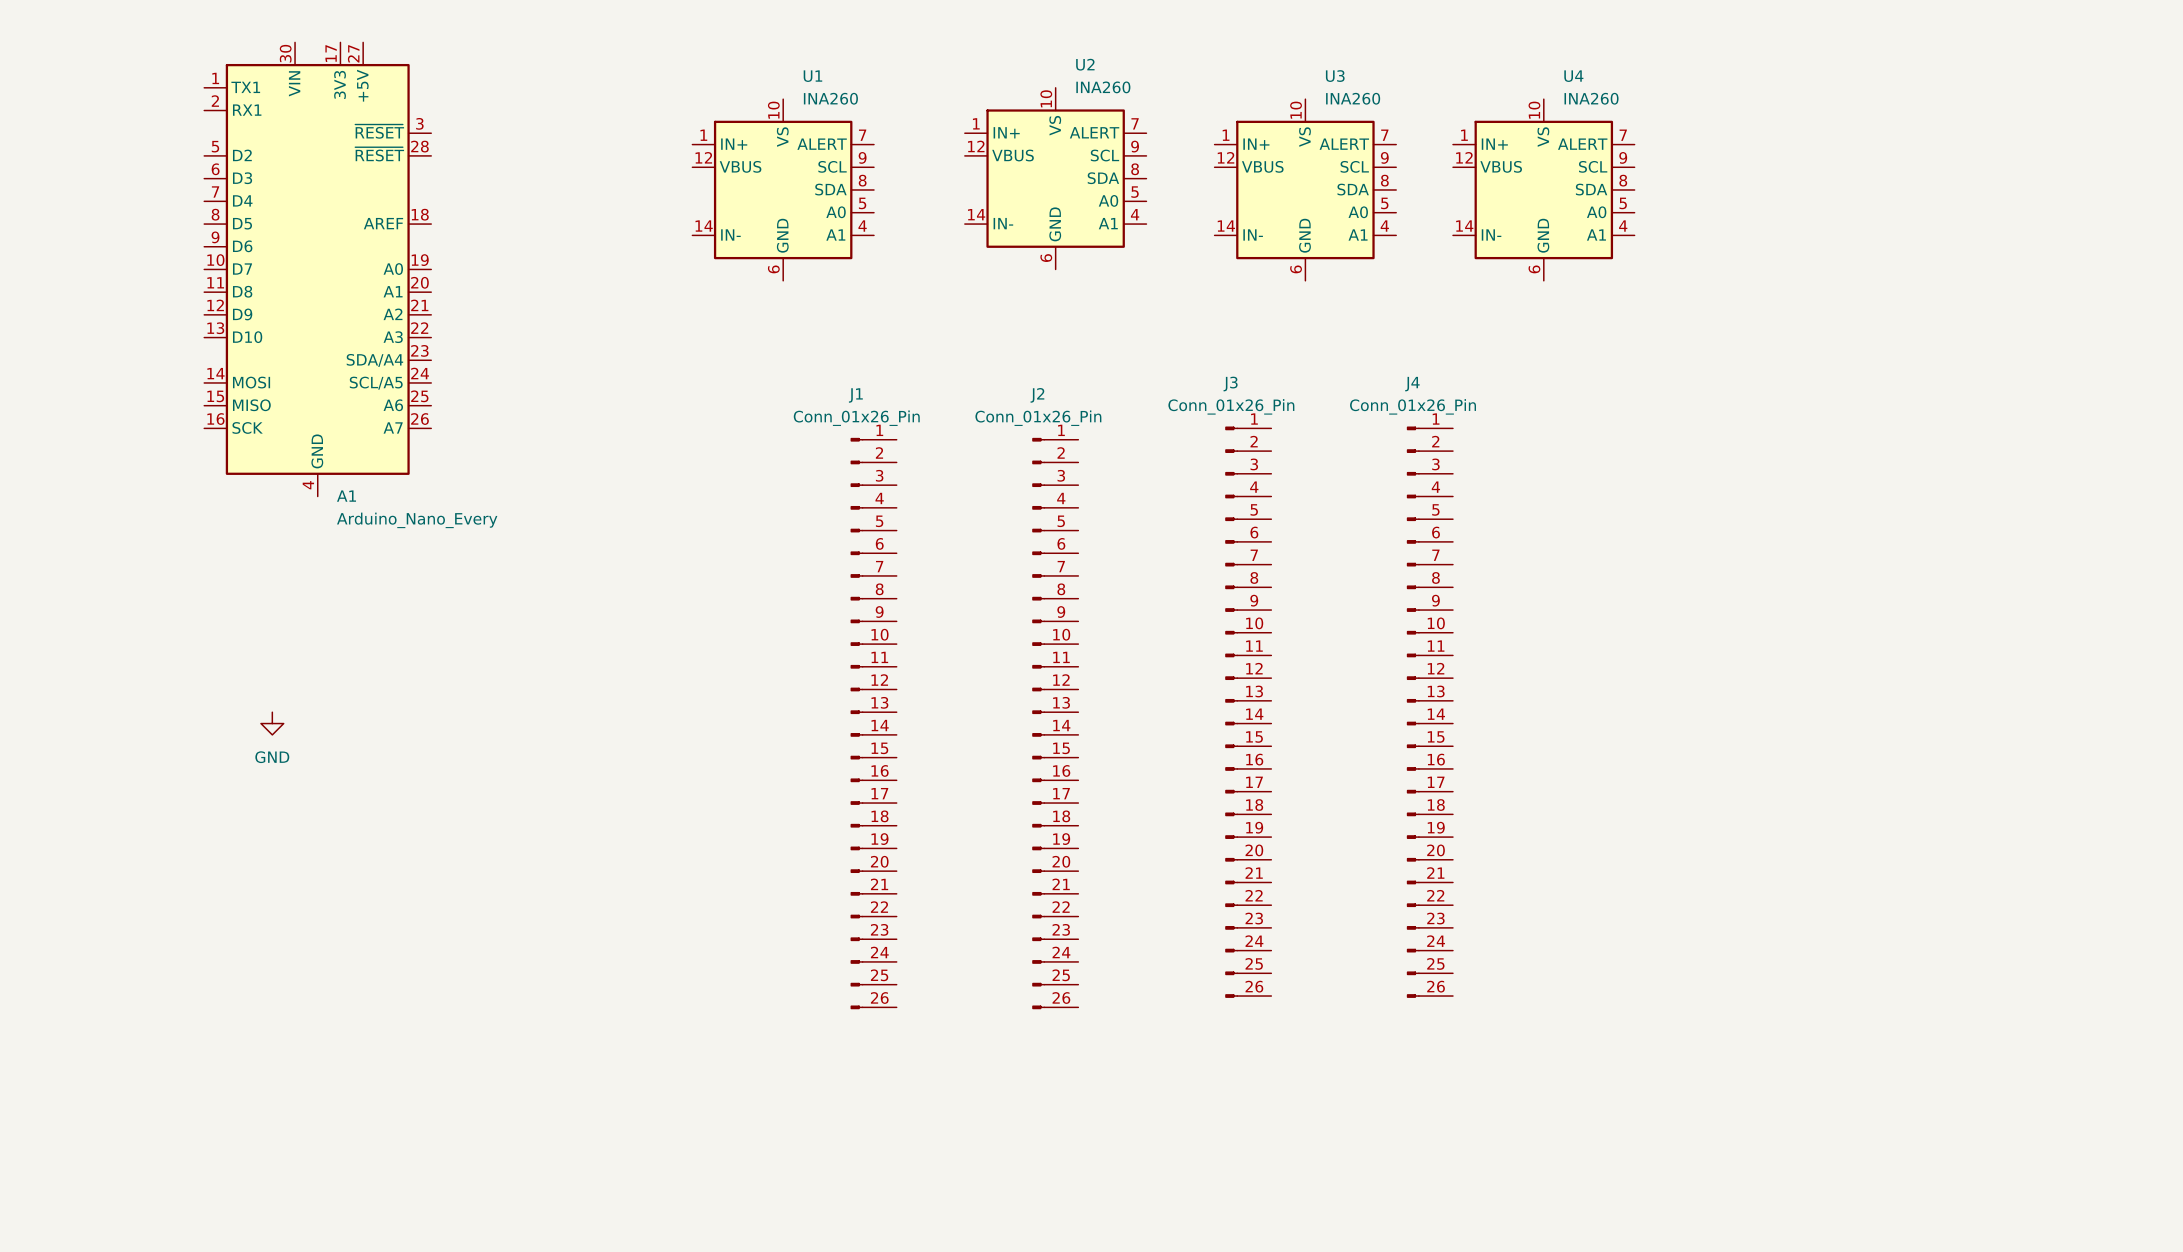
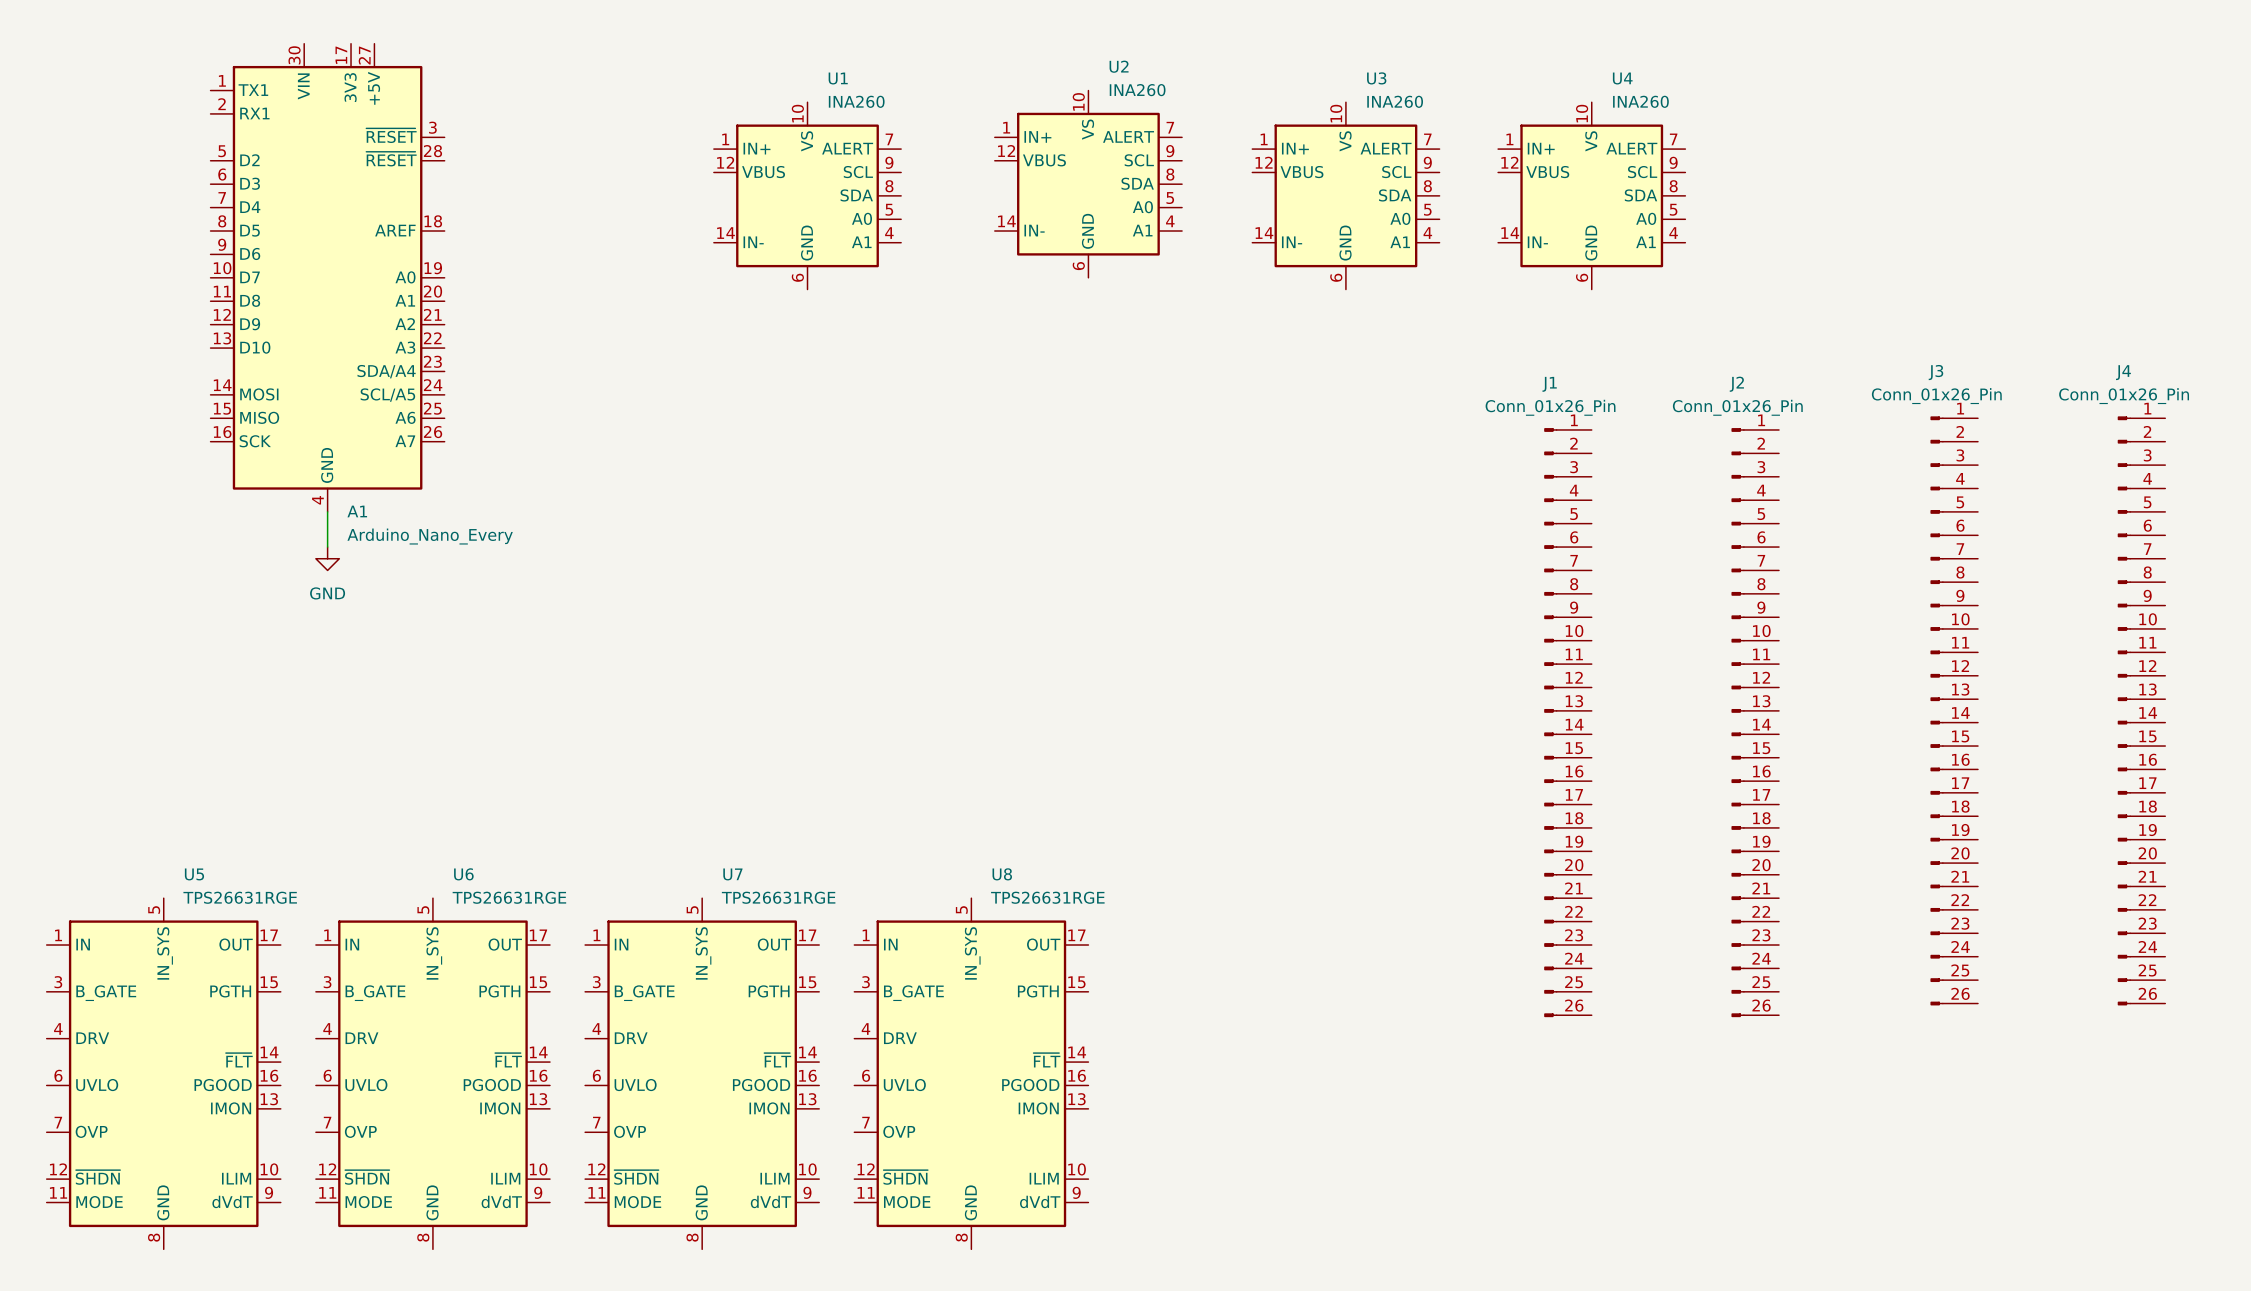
wire: none -> (327, 511) (327, 547)
J3 position: (1248, 712) -> (1954, 710)
J4 position: (1429, 712) -> (2141, 710)
power symbol position: GND (272, 723) -> GND (327, 558)
J1 position: (873, 723) -> (1567, 722)
J2 position: (1055, 723) -> (1755, 722)
U5: none -> TPS26631RGE (163, 1073)
U6: none -> TPS26631RGE (432, 1073)
U7: none -> TPS26631RGE (702, 1073)
U8: none -> TPS26631RGE (971, 1073)

